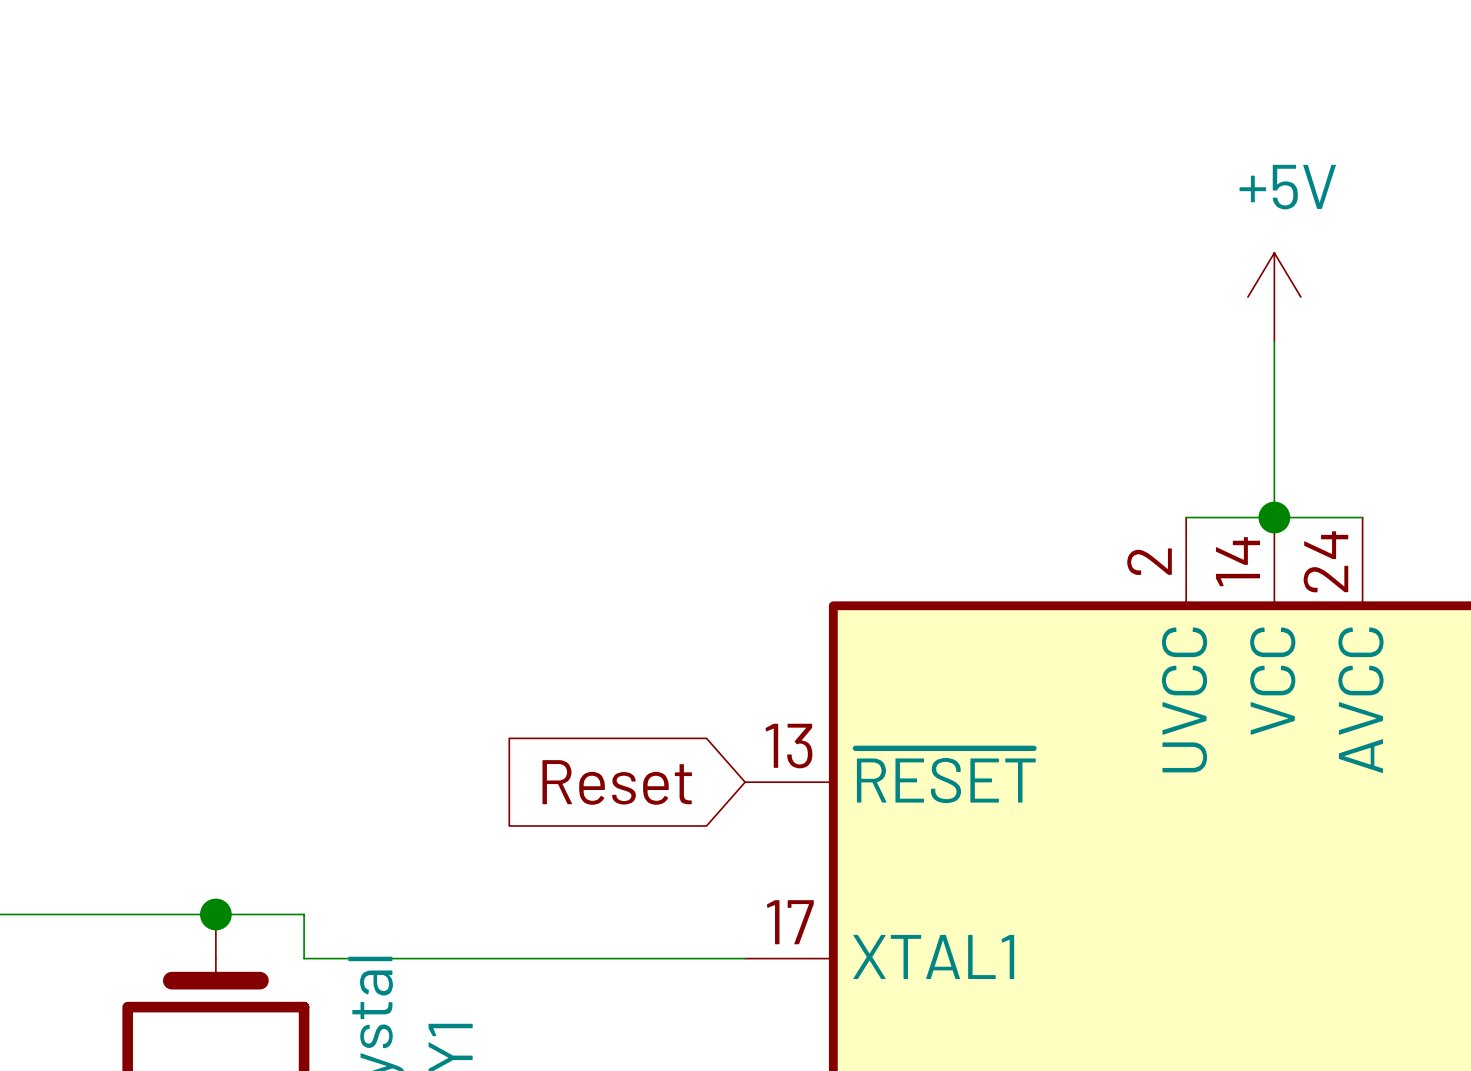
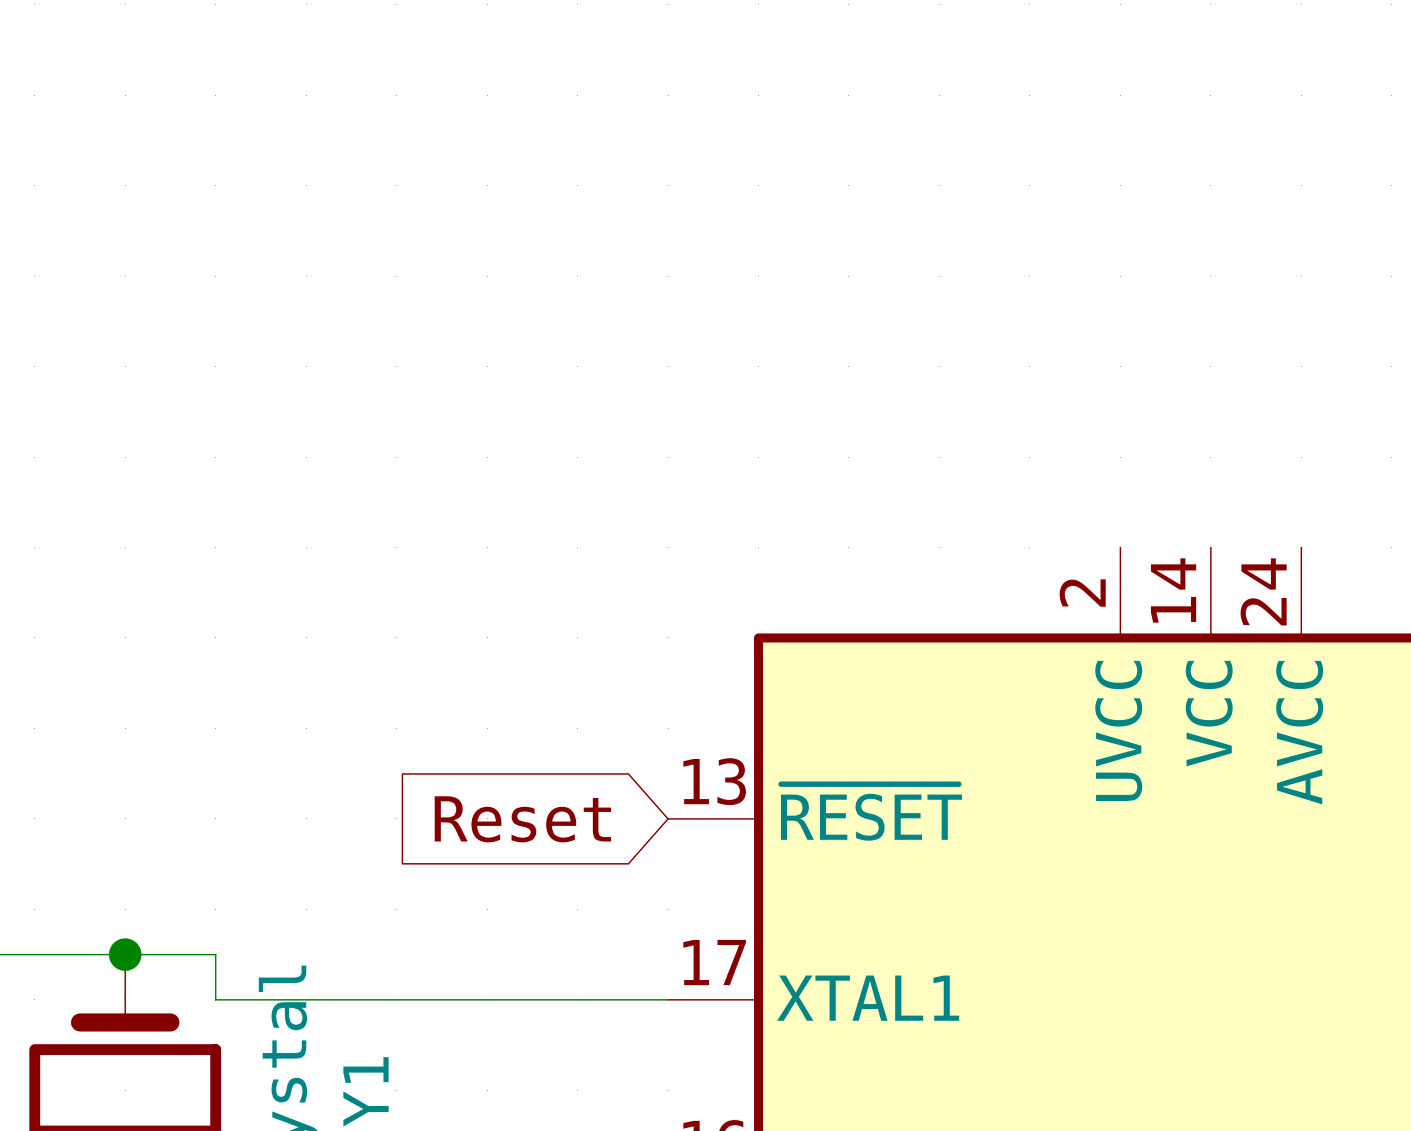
power symbol: +5V (1274, 297) -> none
wire: (1274, 341) (1274, 517) -> none
wire: (1186, 517) (1362, 517) -> none
junction: (1274, 517) -> none

